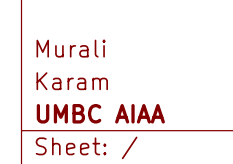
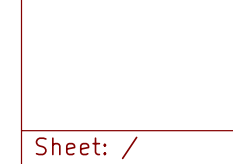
title block: Murali (71, 48) -> none
title block: Karam (72, 81) -> none
title block: UMBC AIAA (100, 113) -> none

